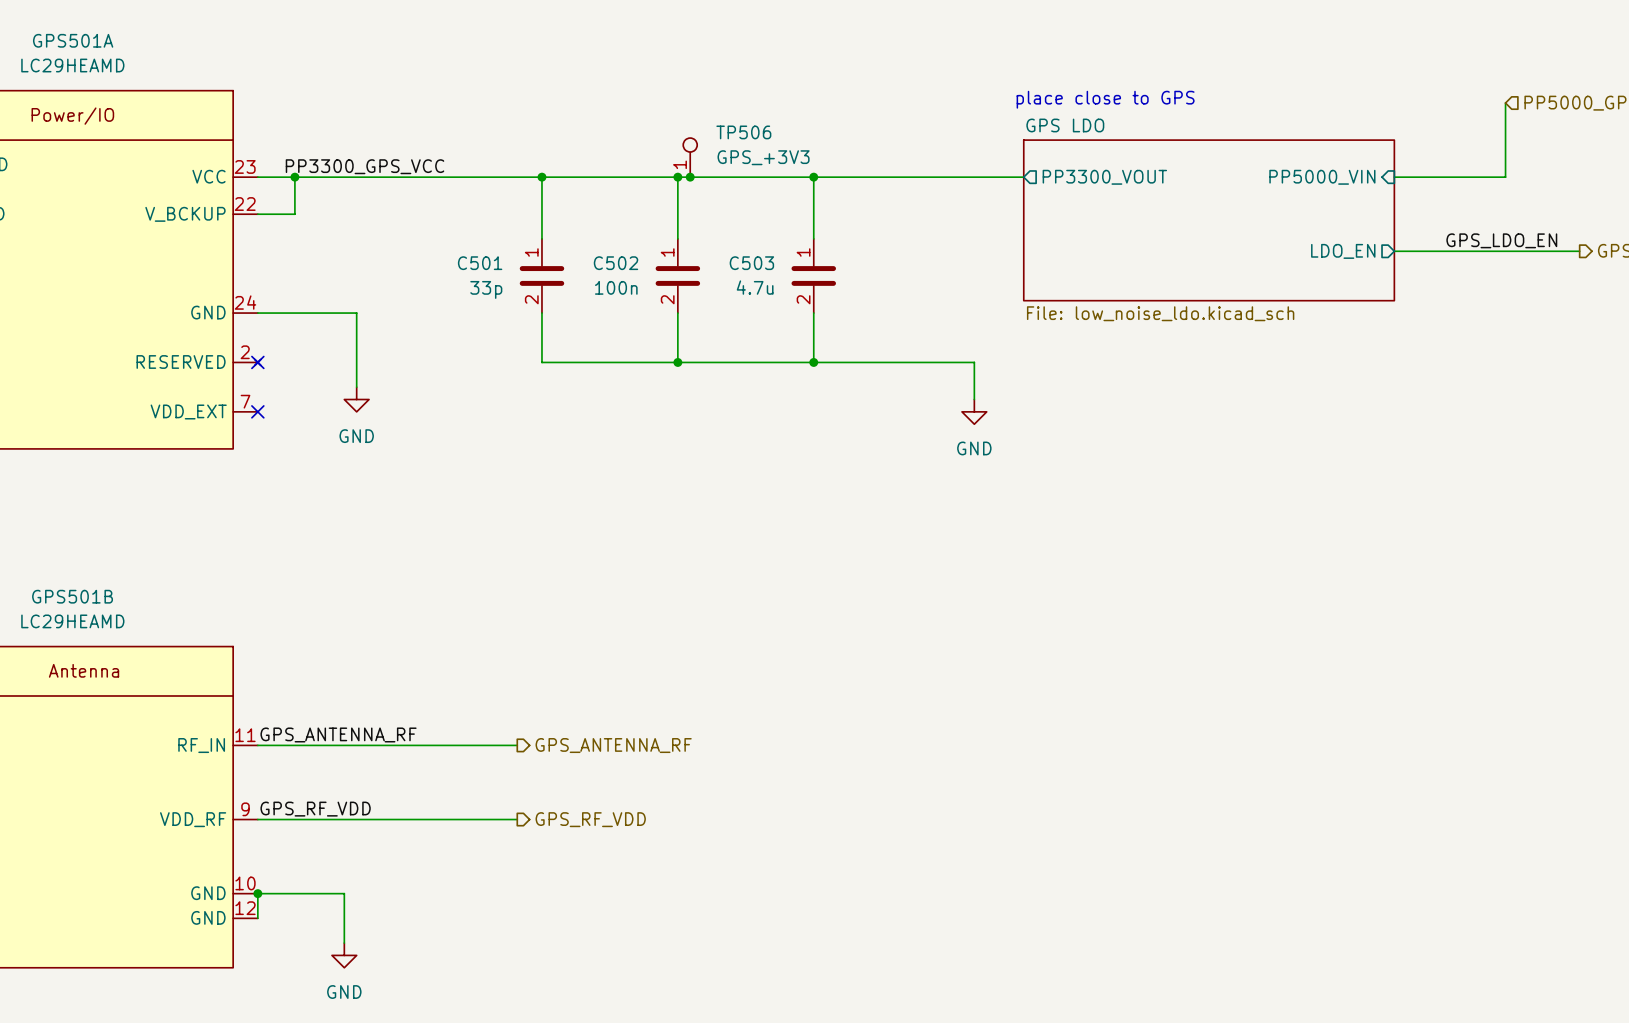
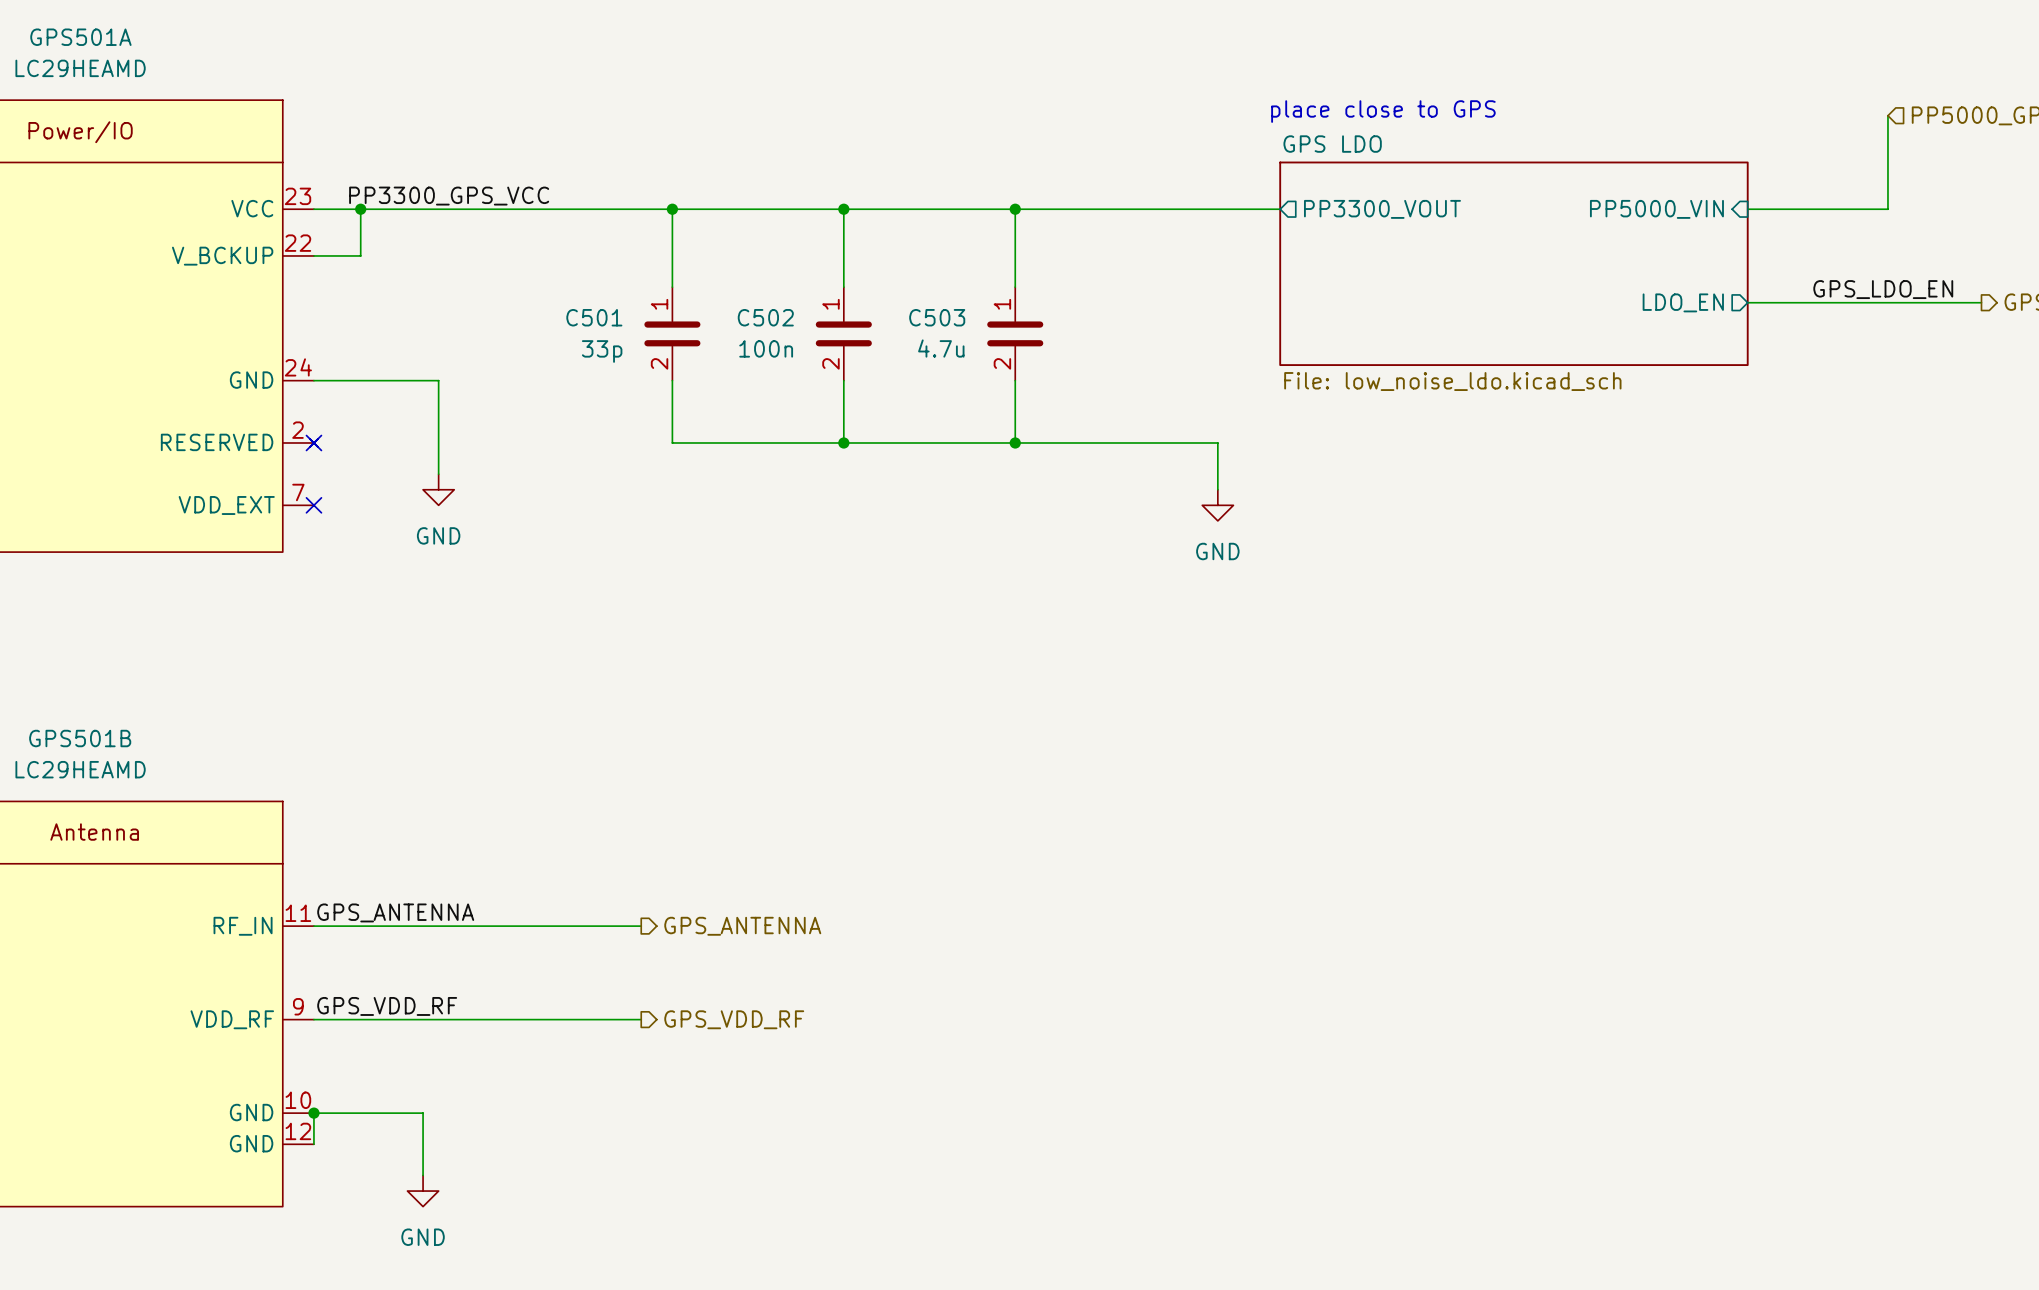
TP506: GPS_+3V3 (690, 157) -> none
junction: (690, 177) -> none
label: GPS_ANTENNA_RF (338, 734) -> GPS_ANTENNA (395, 912)
hierarchical label: GPS_ANTENNA_RF (613, 745) -> GPS_ANTENNA (742, 926)
label: GPS_RF_VDD (315, 809) -> GPS_VDD_RF (387, 1006)
hierarchical label: GPS_RF_VDD (590, 819) -> GPS_VDD_RF (734, 1019)

